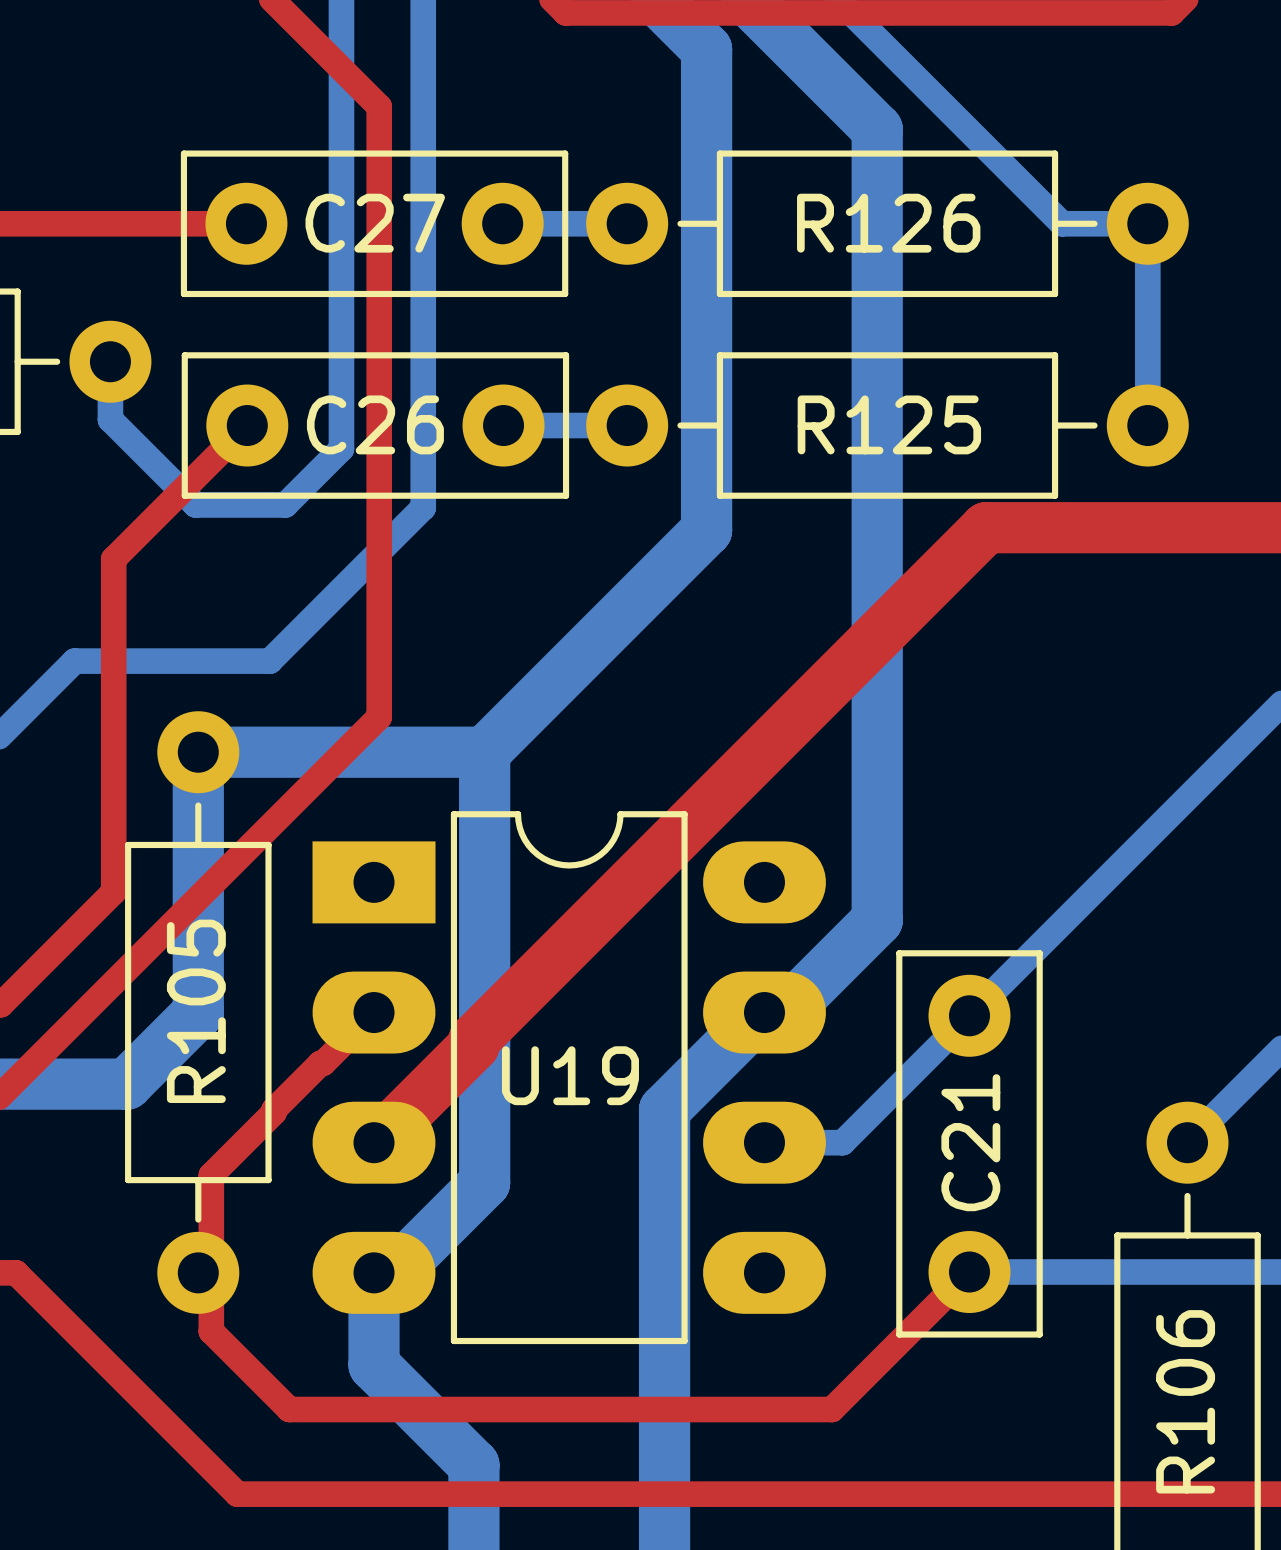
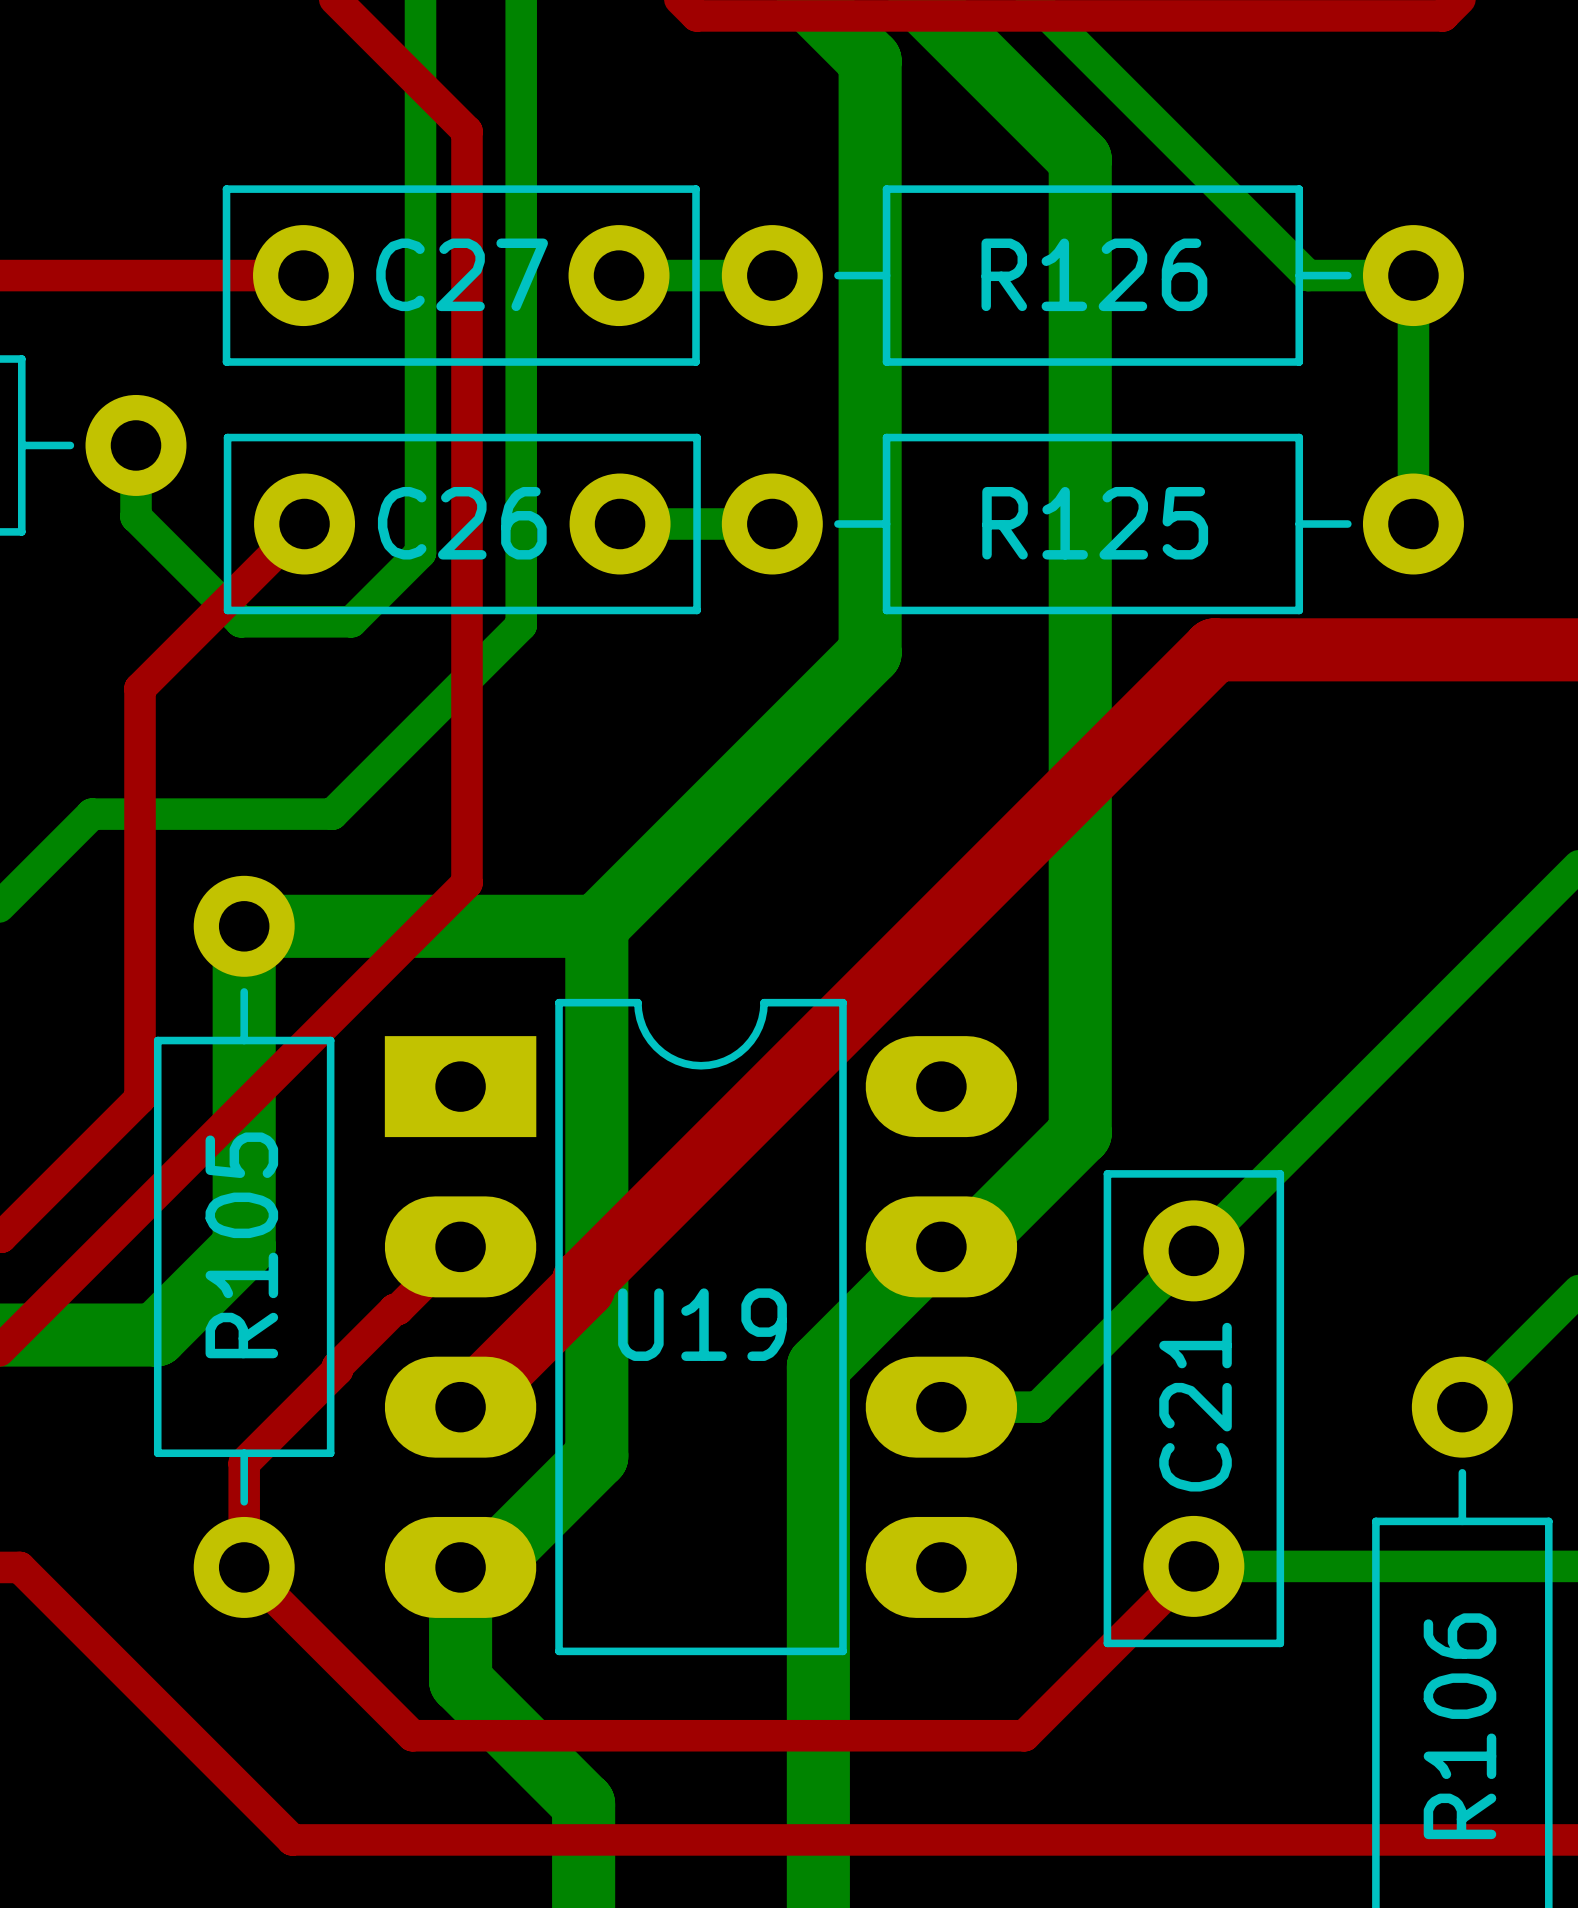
top track: (211, 1175) (211, 1331) (289, 1409) (334, 1409) -> (260, 1447) (244, 1463) (244, 1567) (412, 1735)

